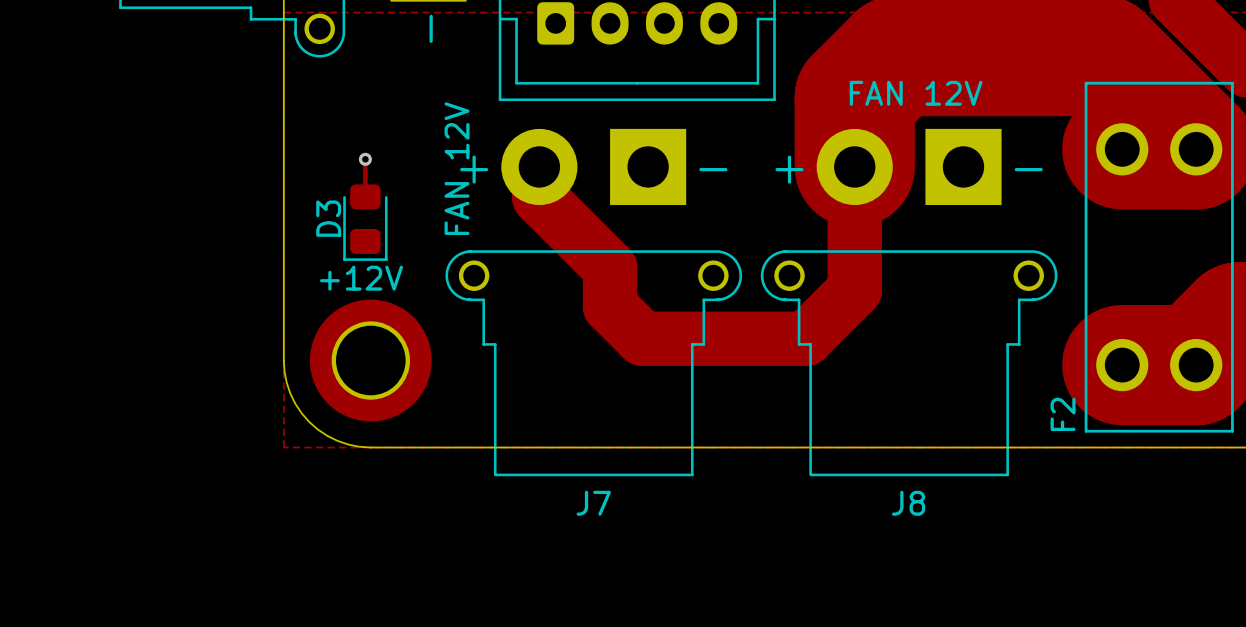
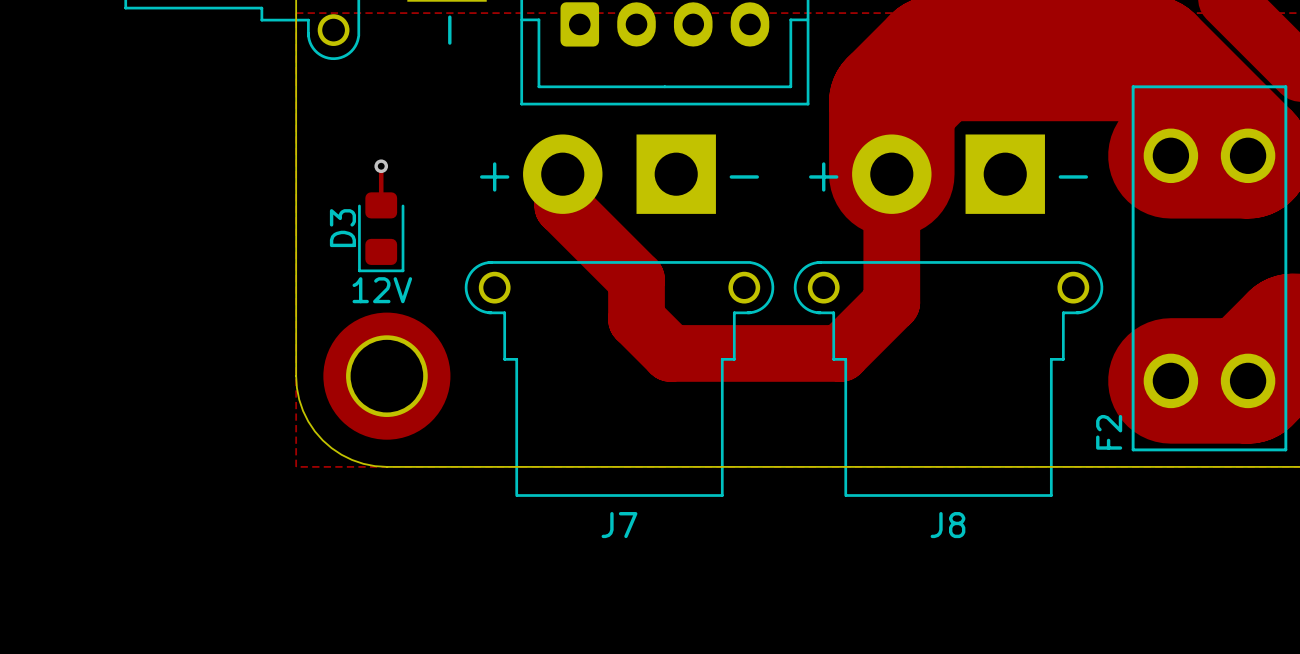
text: FAN 12V (916, 93) -> none
text: FAN 12V (457, 168) -> none
text: +12V (361, 278) -> 12V (382, 290)

